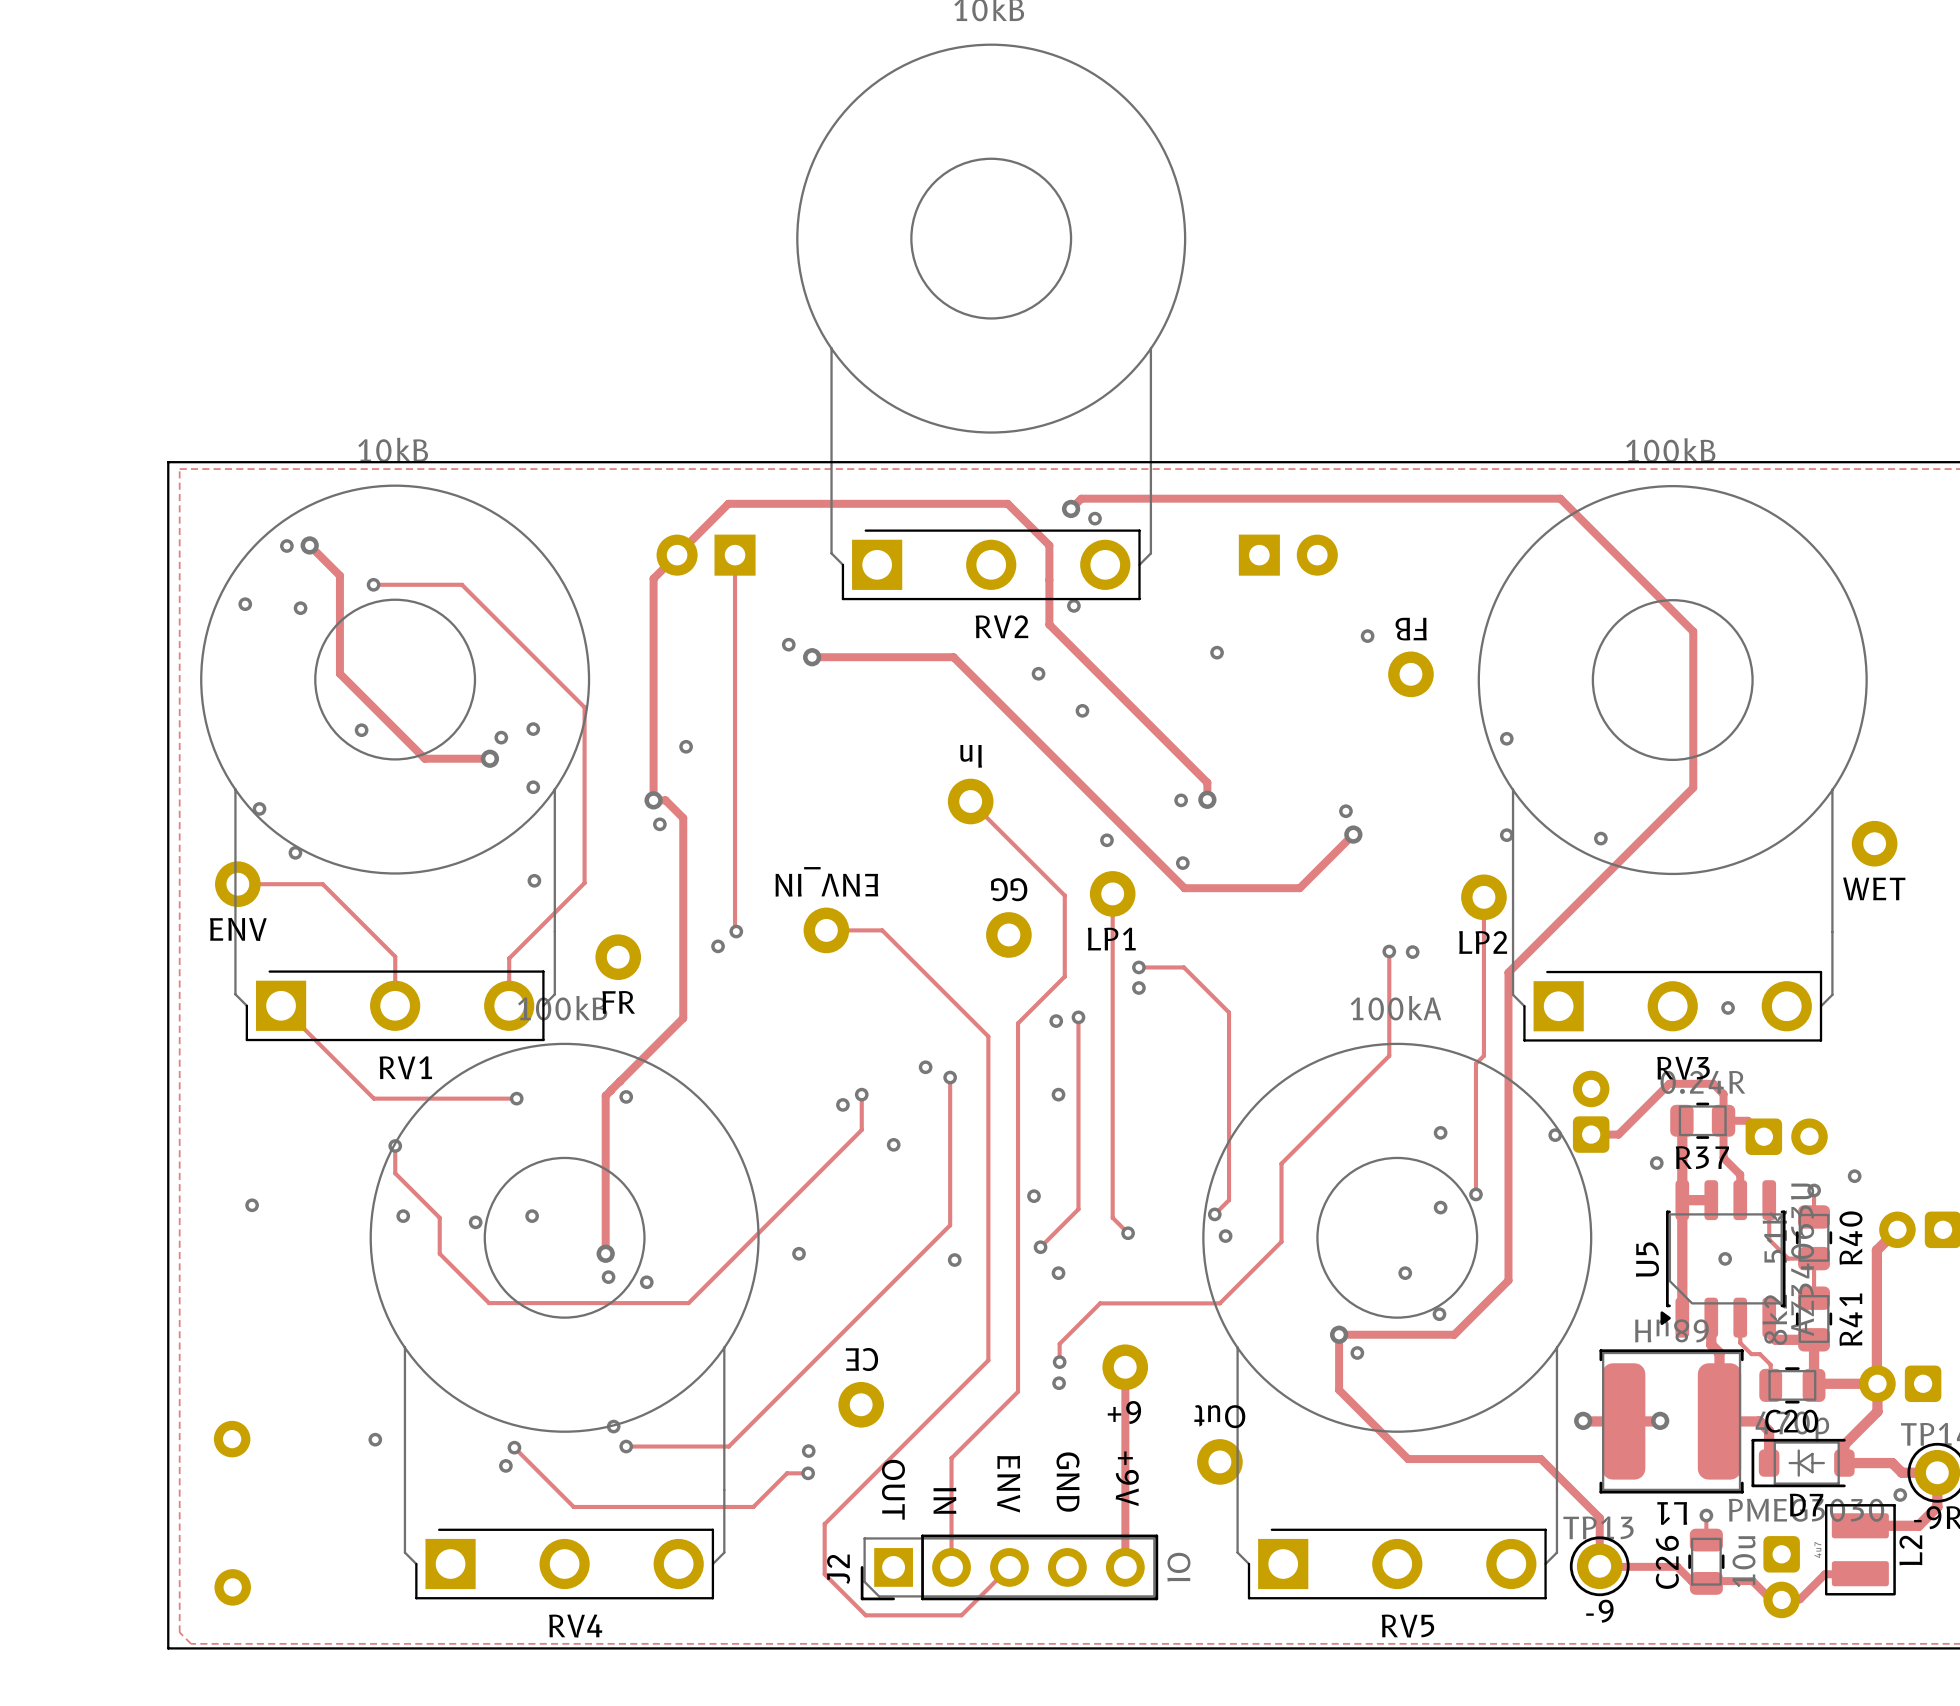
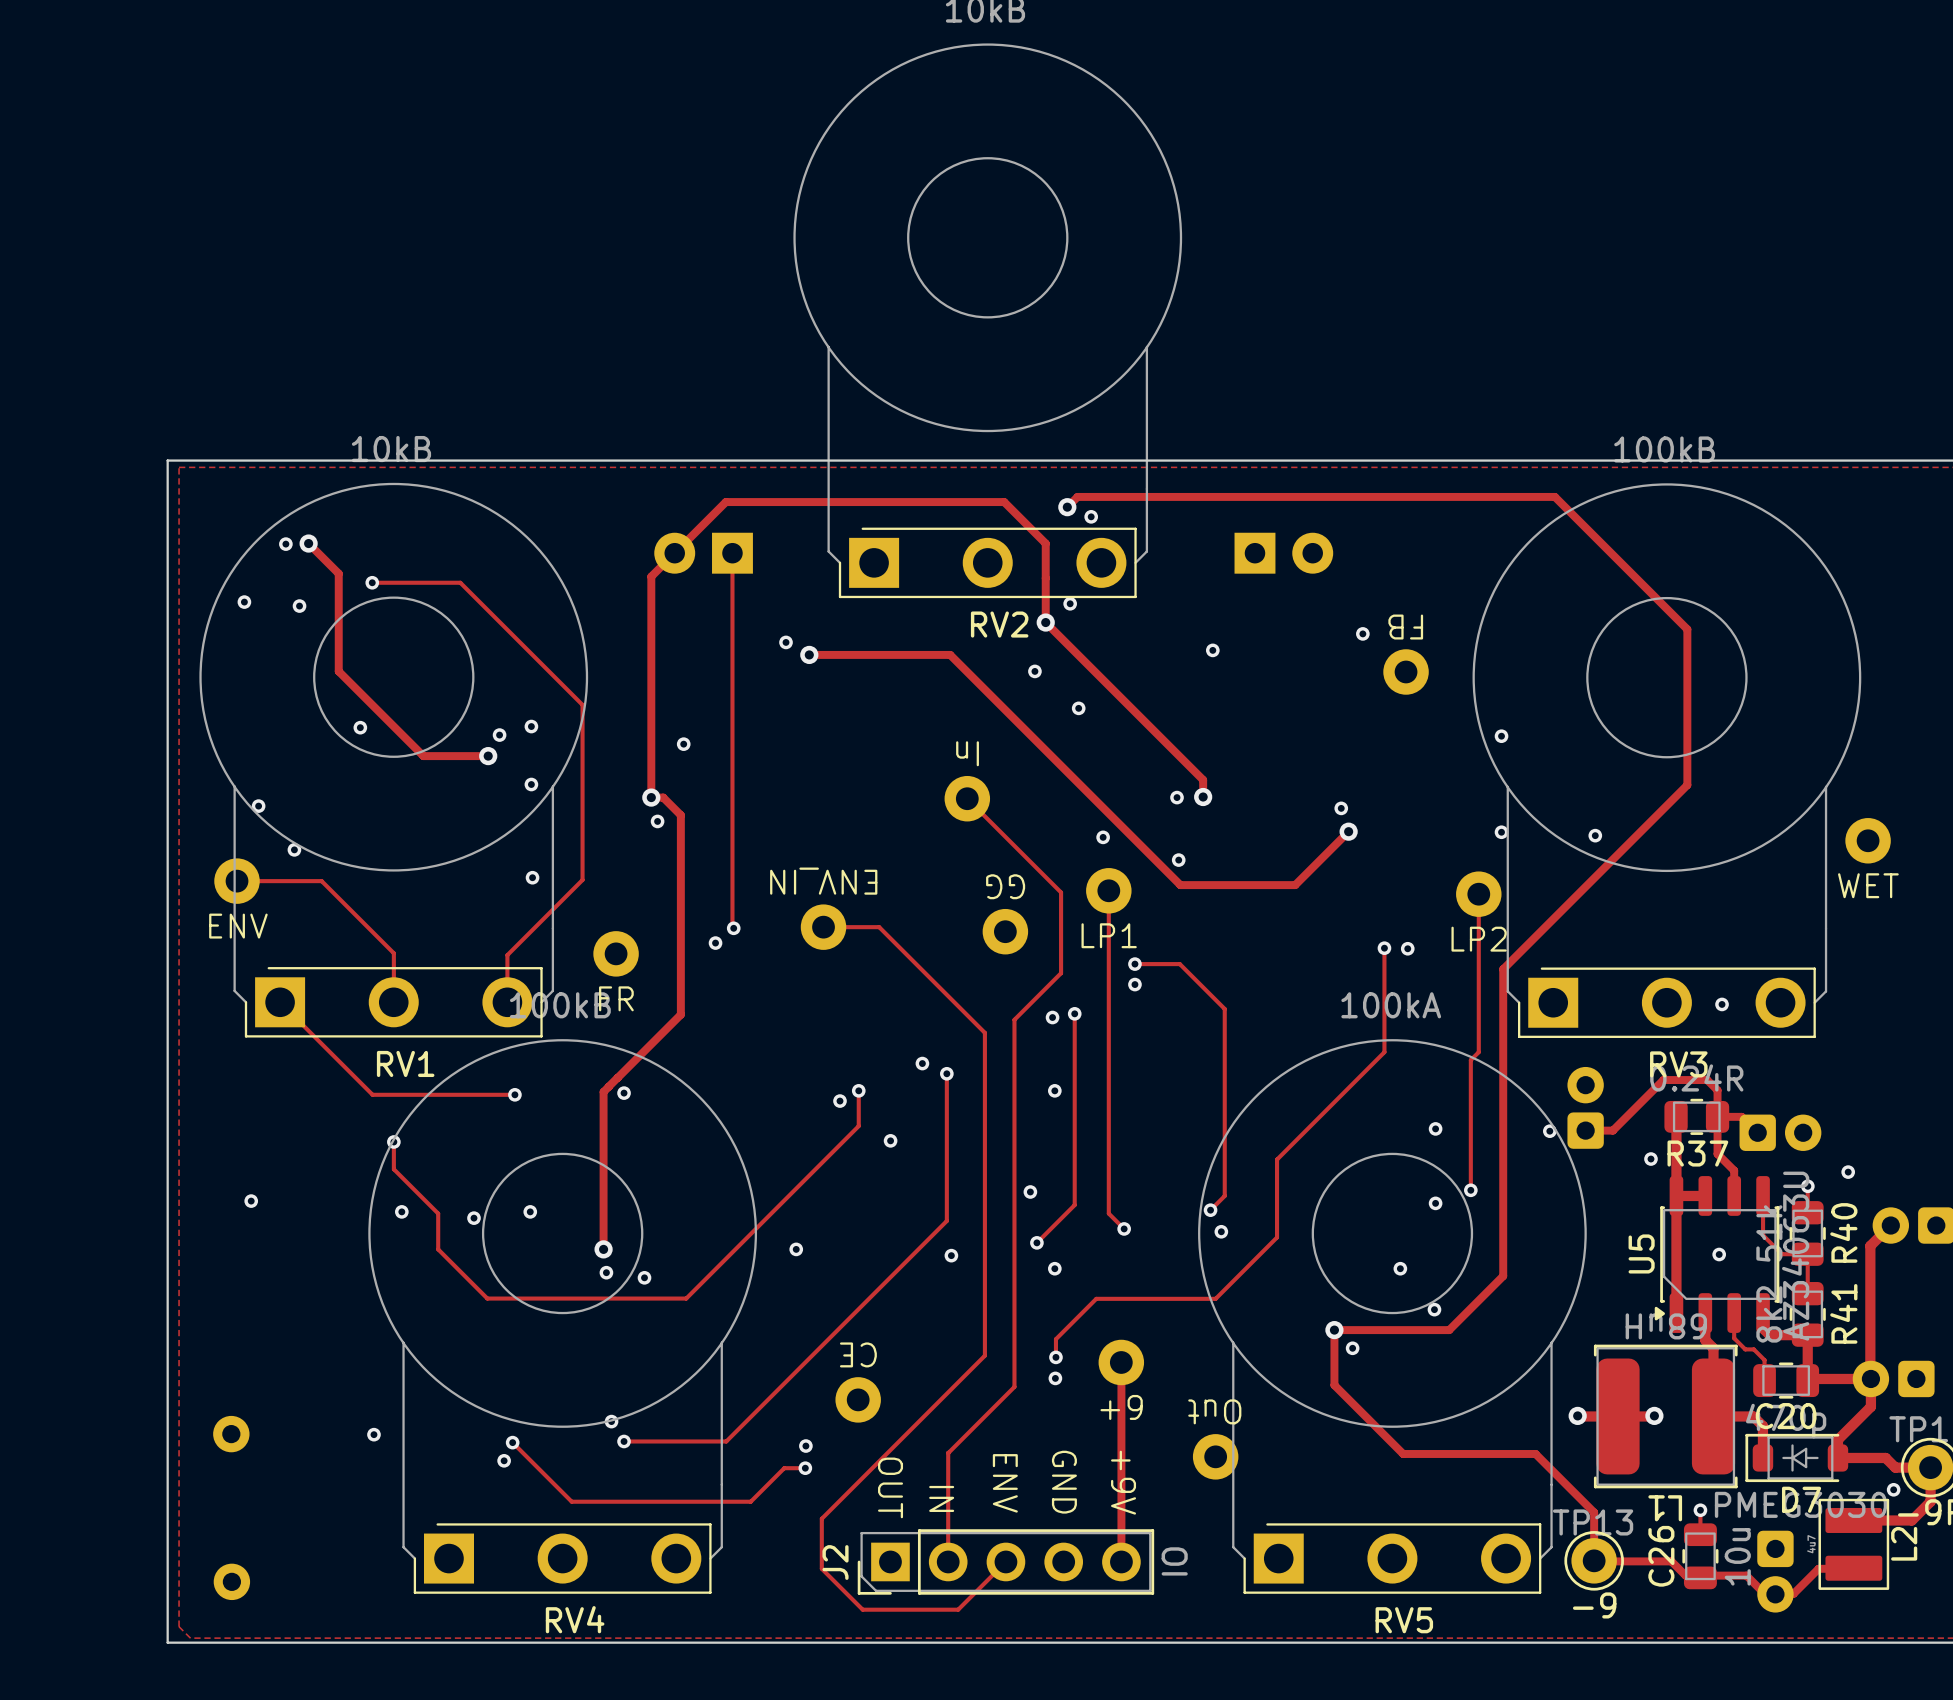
via: none -> (1045, 622)

